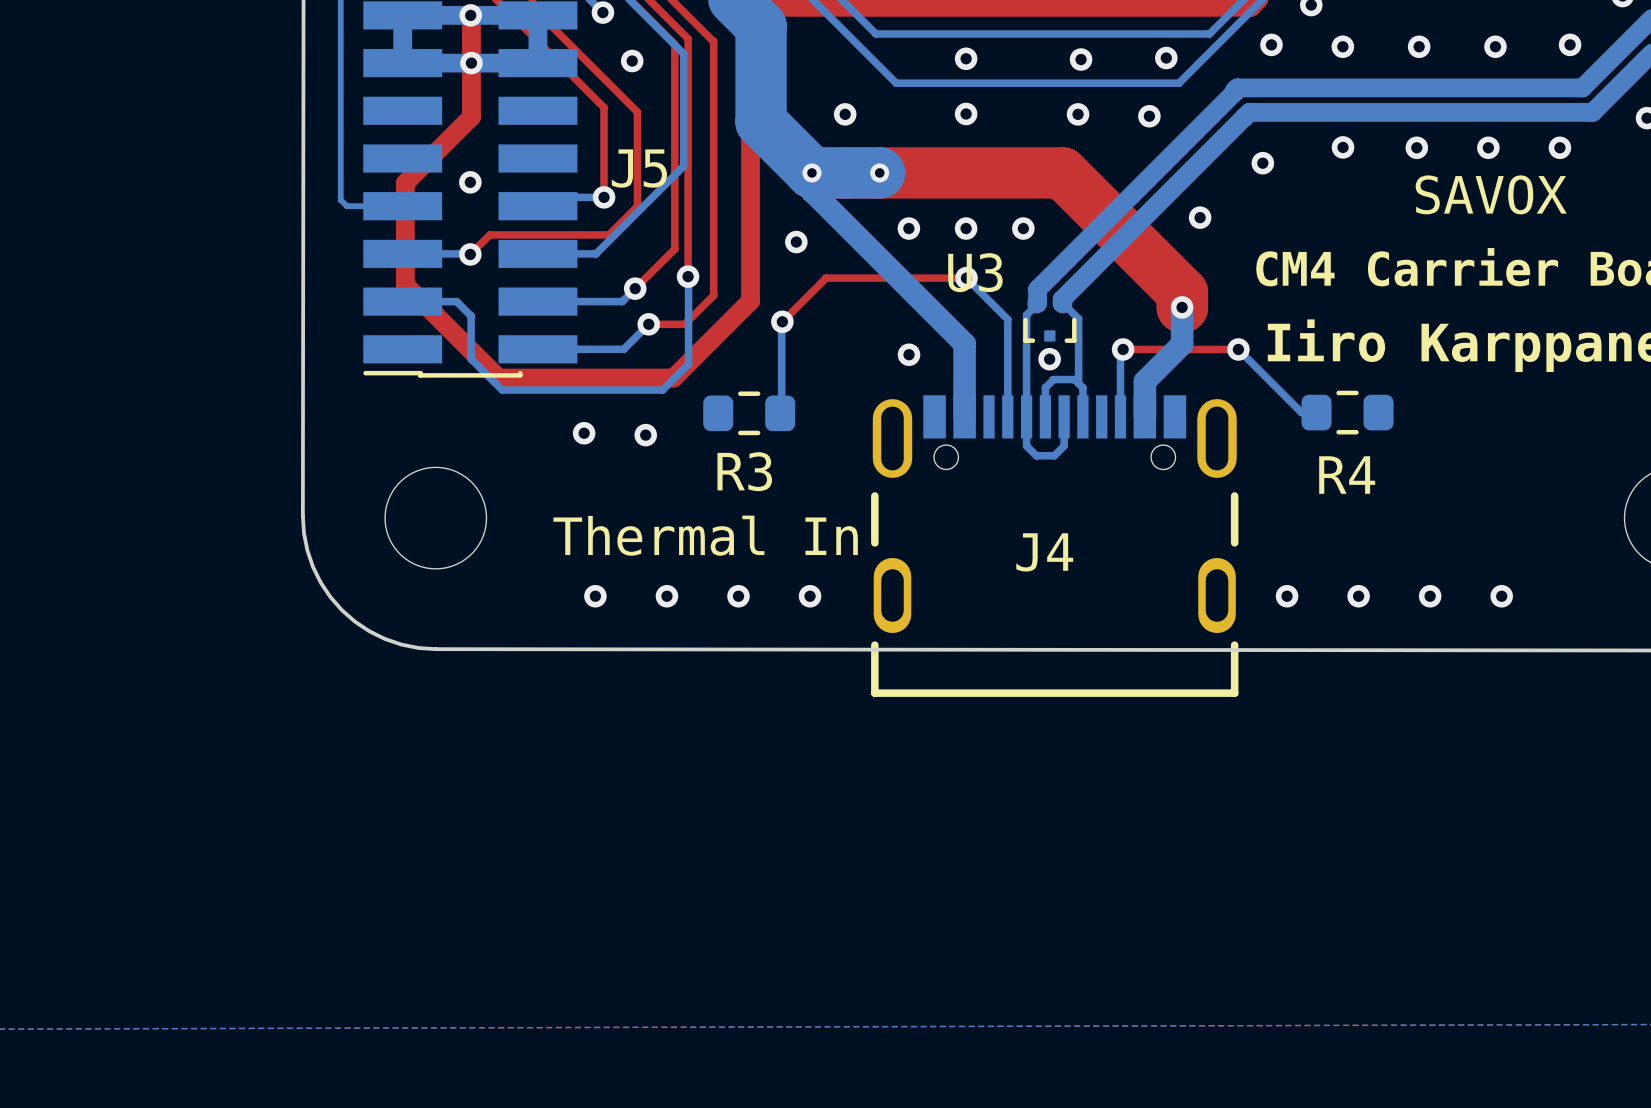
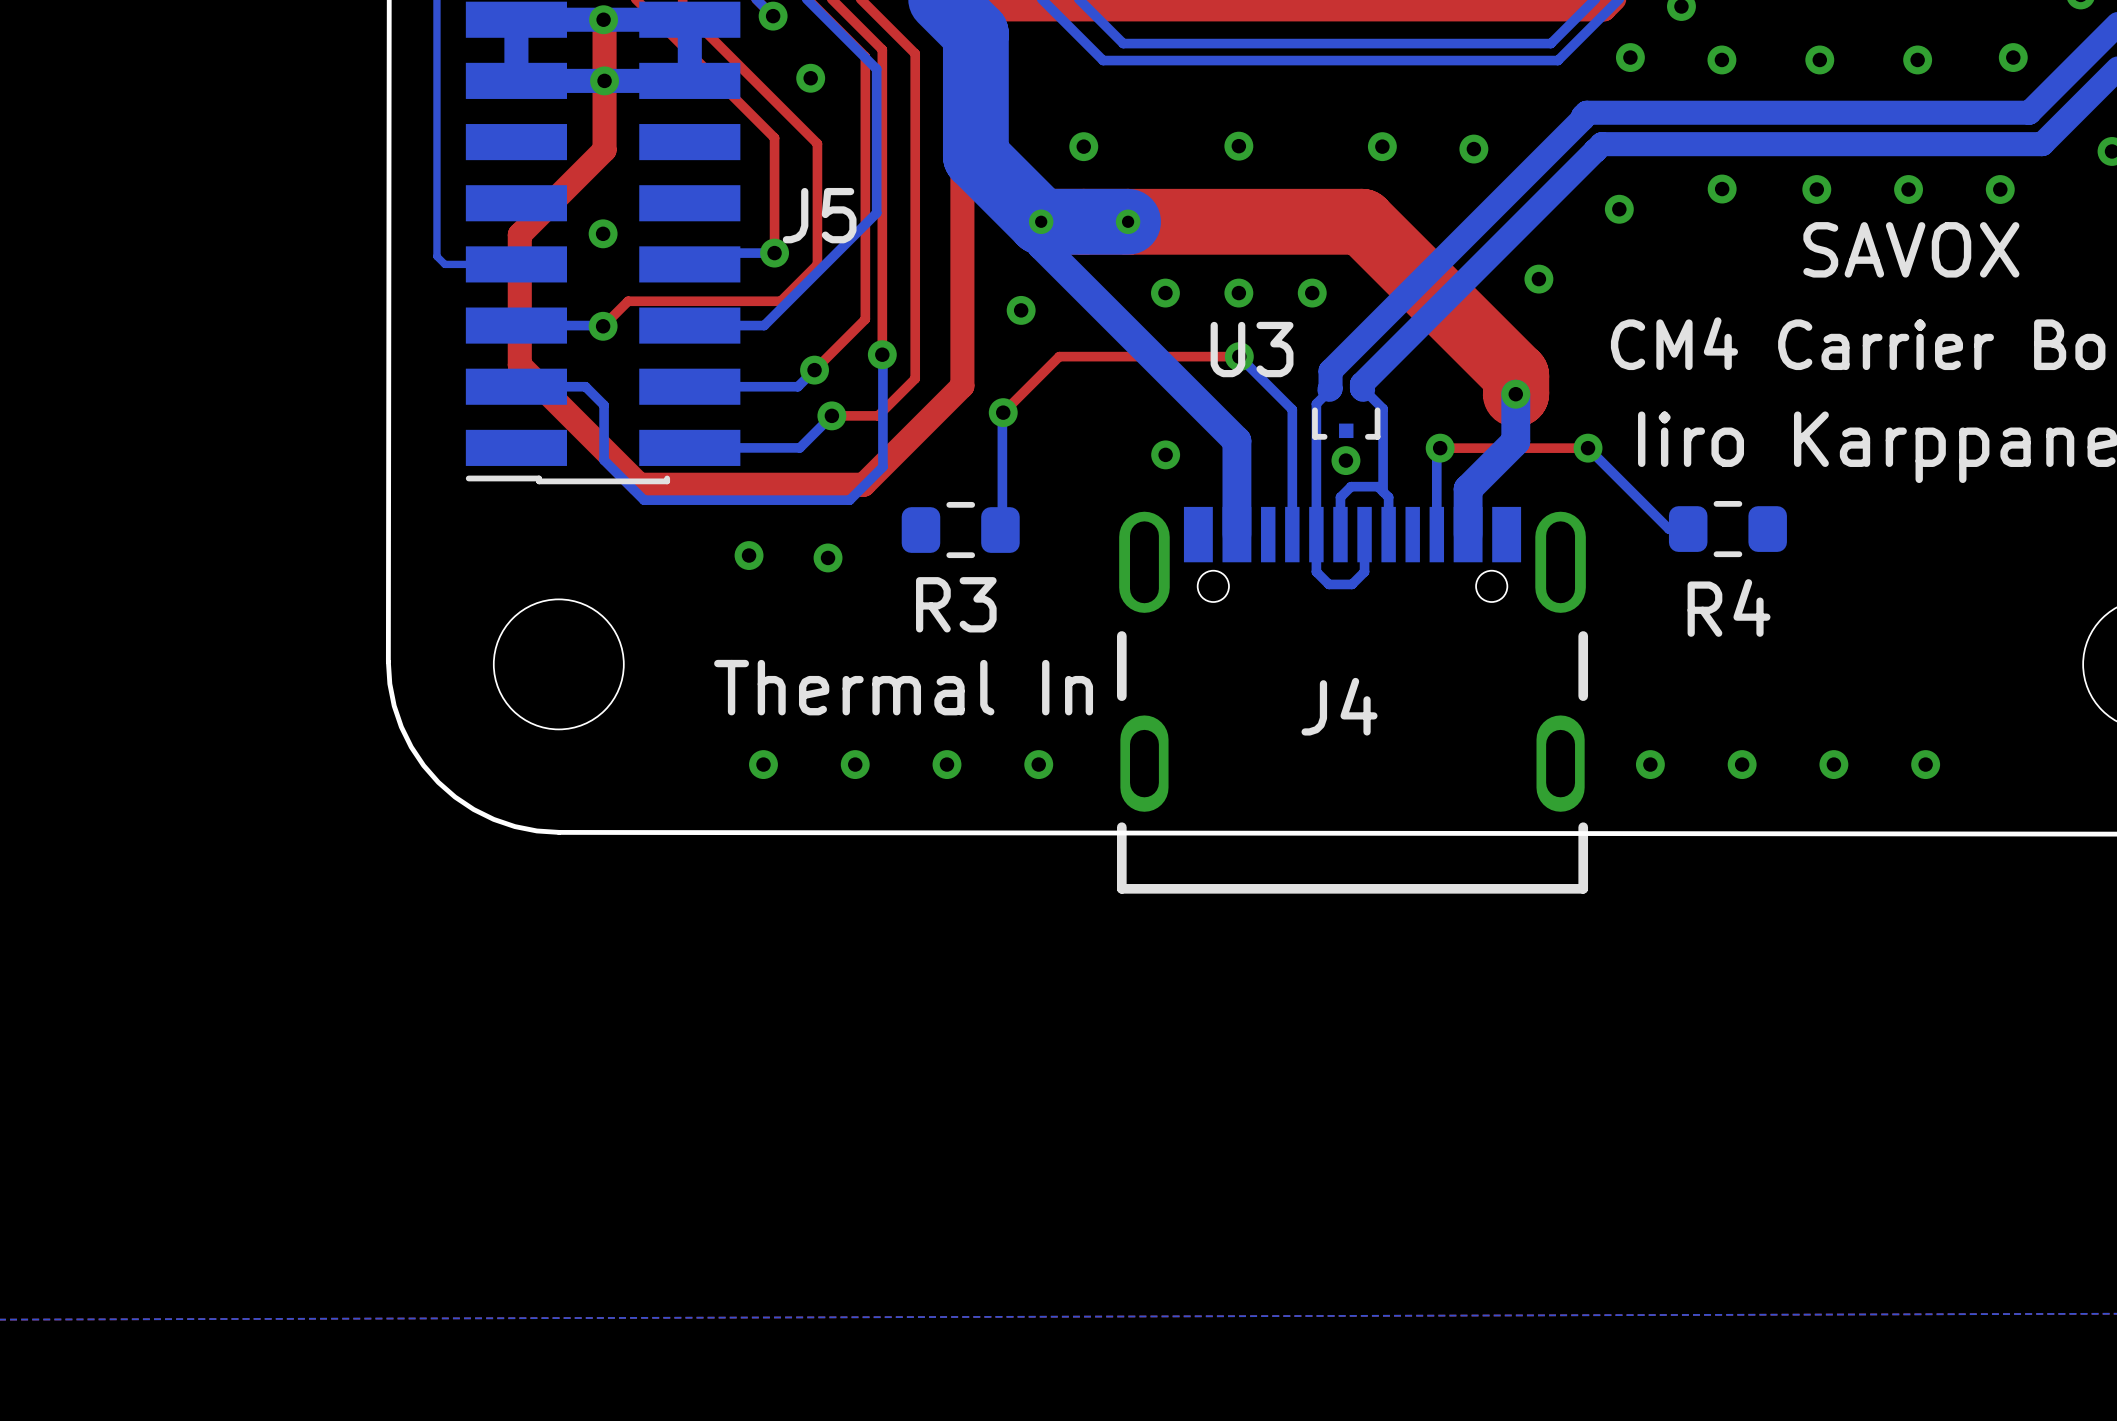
bottom track: (1214, 47) (1179, 83) (896, 83) (860, 47) -> (1557, 60) (1103, 60)
via: (966, 58) -> none
via: (1166, 58) -> none
via: (1081, 59) -> none

